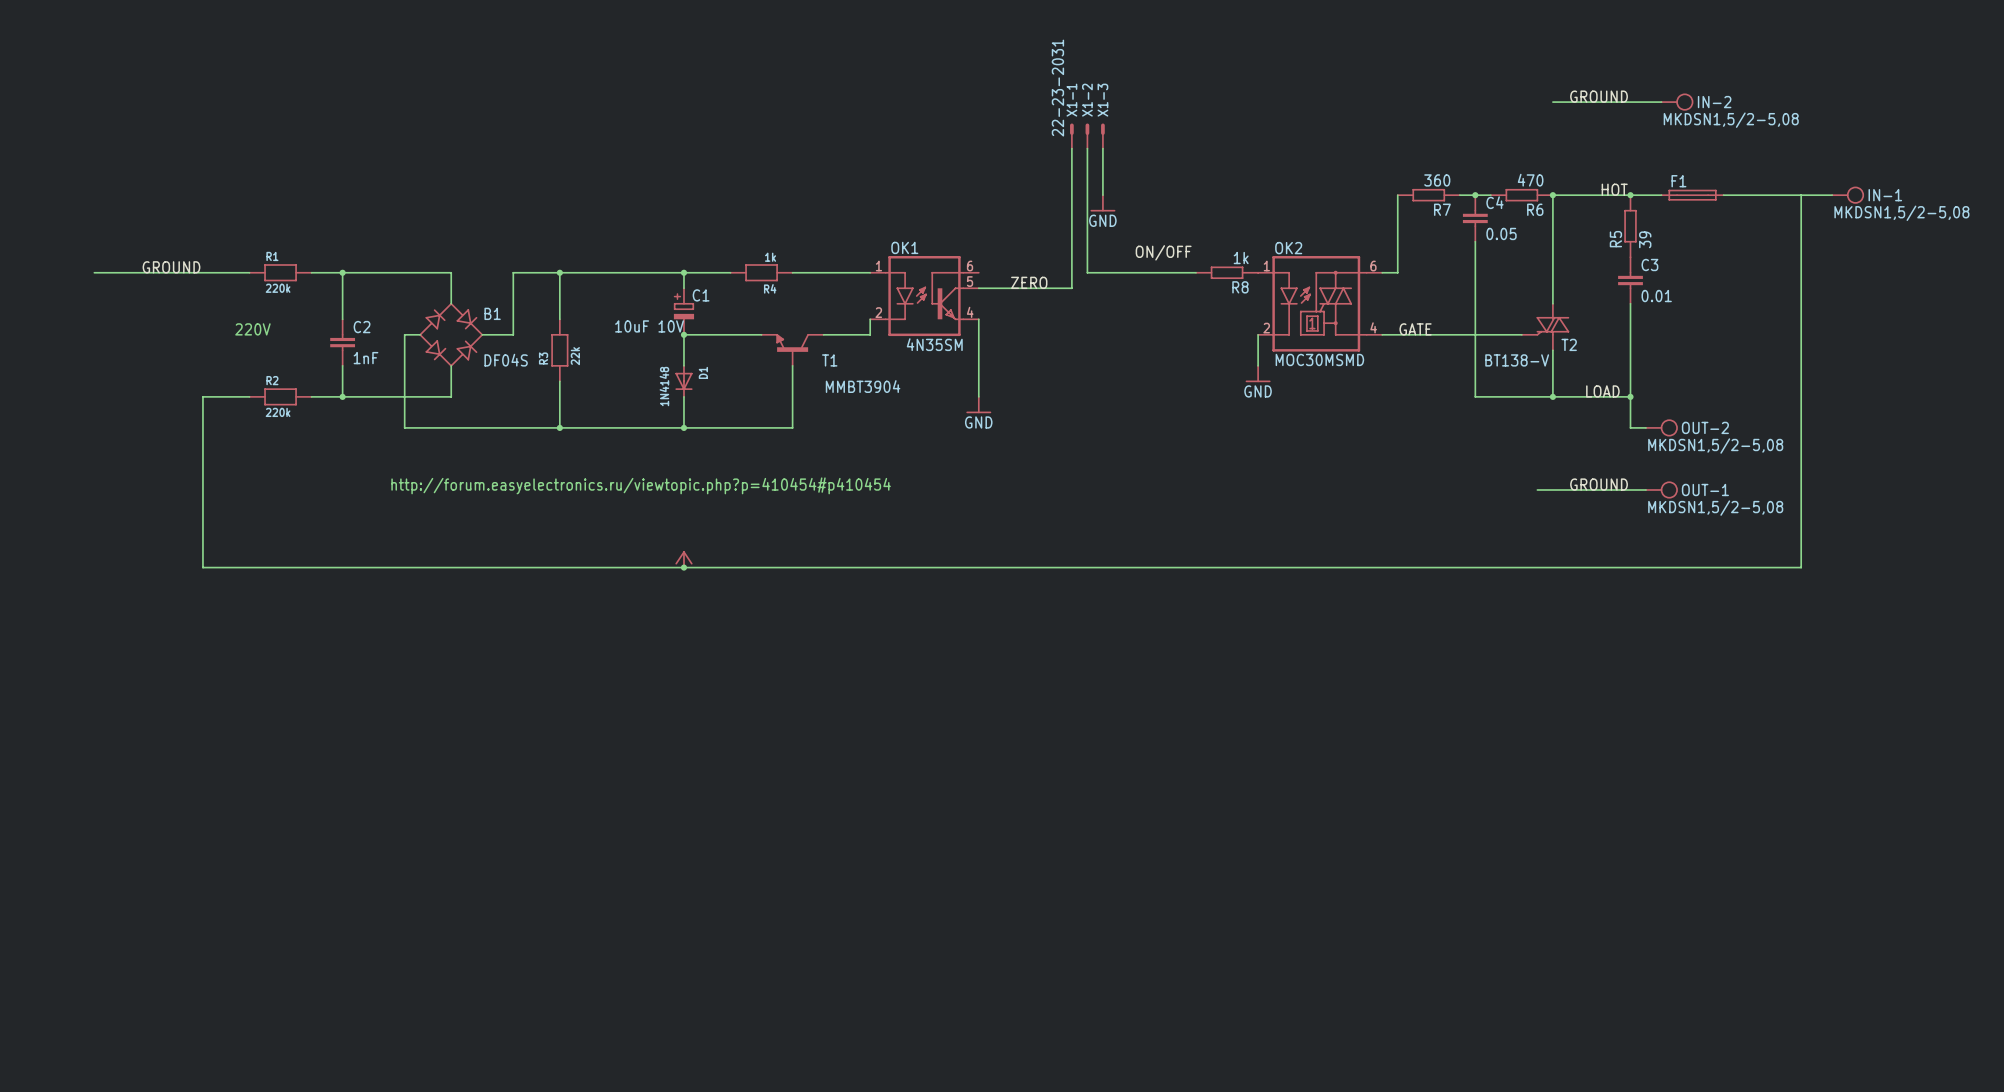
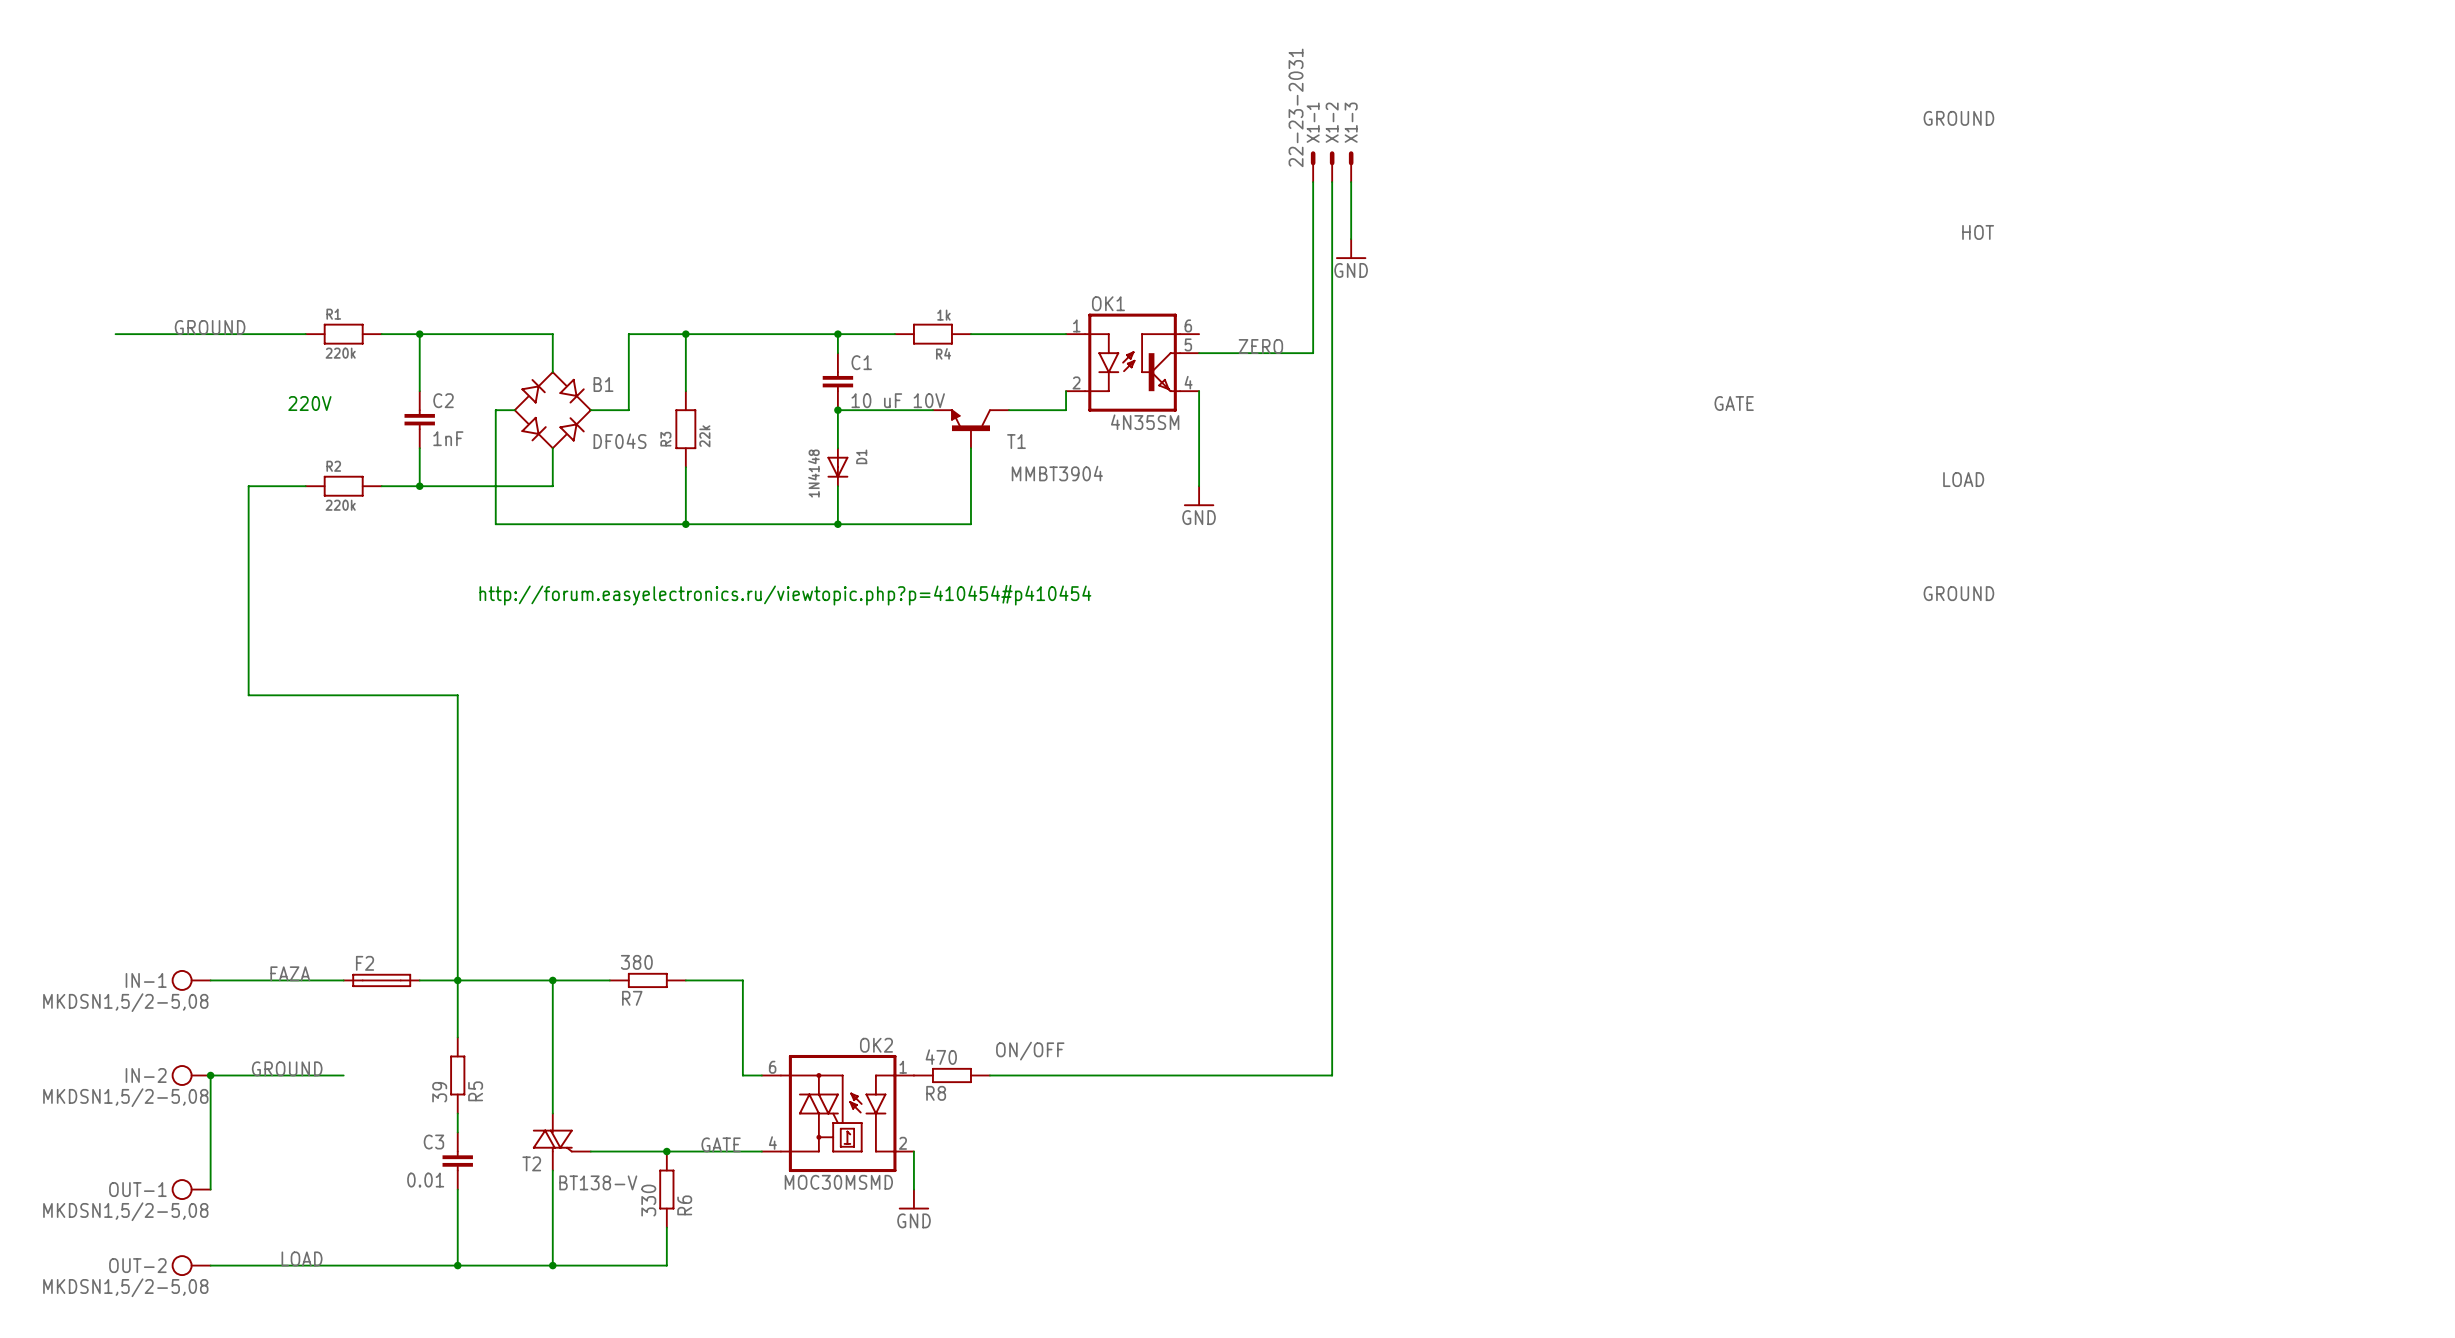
wire: (1552, 102) (1661, 102) -> none
IN-2 position: (1677, 102) -> (191, 1075)
IN-2 rotation: 0° (1684, 102) -> 180° (182, 1075)
IN-2 value position: MKDSN1,5/2-5,08 (1731, 120) -> MKDSN1,5/2-5,08 (125, 1097)
R7 value: 360 (1437, 180) -> 380 (636, 962)
R6 value: 470 (1530, 180) -> 330 (648, 1200)
wire: (1397, 195) (1397, 272) (1382, 272) -> none
R7 position: (1428, 195) -> (647, 980)
wire: (1459, 195) (1490, 195) -> none
junction: (1475, 195) -> none
R6 rotation: 0° (1521, 195) -> 90° clockwise (666, 1189)
R6 position: (1521, 195) -> (666, 1189)
junction: (1552, 195) -> none
junction: (1630, 195) -> none
wire: (1661, 195) (1552, 195) (1552, 303) -> none
F1: (1692, 195) -> none
wire: (1723, 195) (1832, 195) -> none
wire: (1801, 195) (1801, 567) (373, 567) -> (457, 1037) (457, 695)
IN-1 position: (1848, 195) -> (191, 980)
IN-1 rotation: 0° (1855, 195) -> 180° (182, 980)
R7 name position: R7 (1442, 209) -> R7 (632, 998)
IN-1 value position: MKDSN1,5/2-5,08 (1901, 213) -> MKDSN1,5/2-5,08 (125, 1002)
C4: 0.05 (1475, 218) -> none
R5 position: (1630, 226) -> (457, 1075)
R5 name position: R5 (1615, 239) -> R5 (475, 1091)
R5 value position: 39 (1645, 239) -> 39 (439, 1092)
wire: (1475, 241) (1475, 396) (1630, 396) -> none
label: ON/OFF (1163, 252) -> none
R8 value: 1k (1241, 258) -> 470 (941, 1057)
C3 name position: C3 (1649, 265) -> C3 (433, 1142)
wire: (1087, 272) (1196, 272) -> (1332, 334) (1332, 1075) (989, 1075)
R8 position: (1227, 272) -> (951, 1075)
C3 position: (1630, 280) -> (457, 1161)
R8 name position: R8 (1240, 287) -> R8 (936, 1093)
C1 symbol: [673, 288, 695, 335] -> [822, 353, 854, 411]
C3 value position: 0.01 (1656, 296) -> 0.01 (425, 1180)
OK2 flip: as is (1319, 303) -> left-right (838, 1113)
OK2 position: (1320, 303) -> (837, 1113)
wire: (1630, 303) (1630, 427) (1646, 427) -> none
C1 value: 10uF 10V (649, 326) -> 10 uF 10V (898, 400)
T2 flip: as is (1552, 326) -> left-right (552, 1140)
T2 position: (1545, 327) -> (561, 1142)
wire: (1258, 334) (1258, 365) -> none
wire: (1382, 334) (1521, 334) -> none
wire: (1552, 350) (1552, 396) -> none
power symbol: GND (1258, 374) -> none
junction: (1552, 396) -> none
junction: (1630, 396) -> none
OUT-2 position: (1661, 427) -> (191, 1265)
OUT-2 rotation: 0° (1669, 427) -> 180° (182, 1265)
OUT-2 value position: MKDSN1,5/2-5,08 (1715, 446) -> MKDSN1,5/2-5,08 (125, 1287)
wire: (1537, 489) (1646, 489) -> none
OUT-1 position: (1661, 489) -> (191, 1189)
OUT-1 rotation: 0° (1669, 489) -> 180° (182, 1189)
OUT-1 value position: MKDSN1,5/2-5,08 (1715, 508) -> MKDSN1,5/2-5,08 (125, 1211)
power symbol: (683, 559) -> none
junction: (683, 567) -> none
label: none -> FAZA (290, 973)
wire: none -> (210, 980) (343, 980)
F2: none -> (381, 980)
wire: none -> (419, 980) (609, 980)
junction: none -> (457, 980)
wire: none -> (552, 980) (552, 1113)
junction: none -> (552, 980)
wire: none -> (685, 980) (742, 980) (742, 1075) (761, 1075)
label: none -> ON/OFF (1030, 1051)
label: none -> GROUND (287, 1068)
junction: none -> (210, 1075)
wire: none -> (343, 1075) (210, 1075) (210, 1189)
wire: none -> (457, 1113) (457, 1132)
label: none -> GATE (721, 1144)
wire: none -> (590, 1151) (761, 1151)
junction: none -> (666, 1151)
wire: none -> (913, 1151) (913, 1189)
wire: none -> (552, 1170) (552, 1265)
wire: none -> (457, 1189) (457, 1265)
power symbol: none -> GND (913, 1199)
wire: none -> (666, 1227) (666, 1265) (210, 1265)
label: none -> LOAD (302, 1258)
junction: none -> (457, 1265)
junction: none -> (552, 1265)

